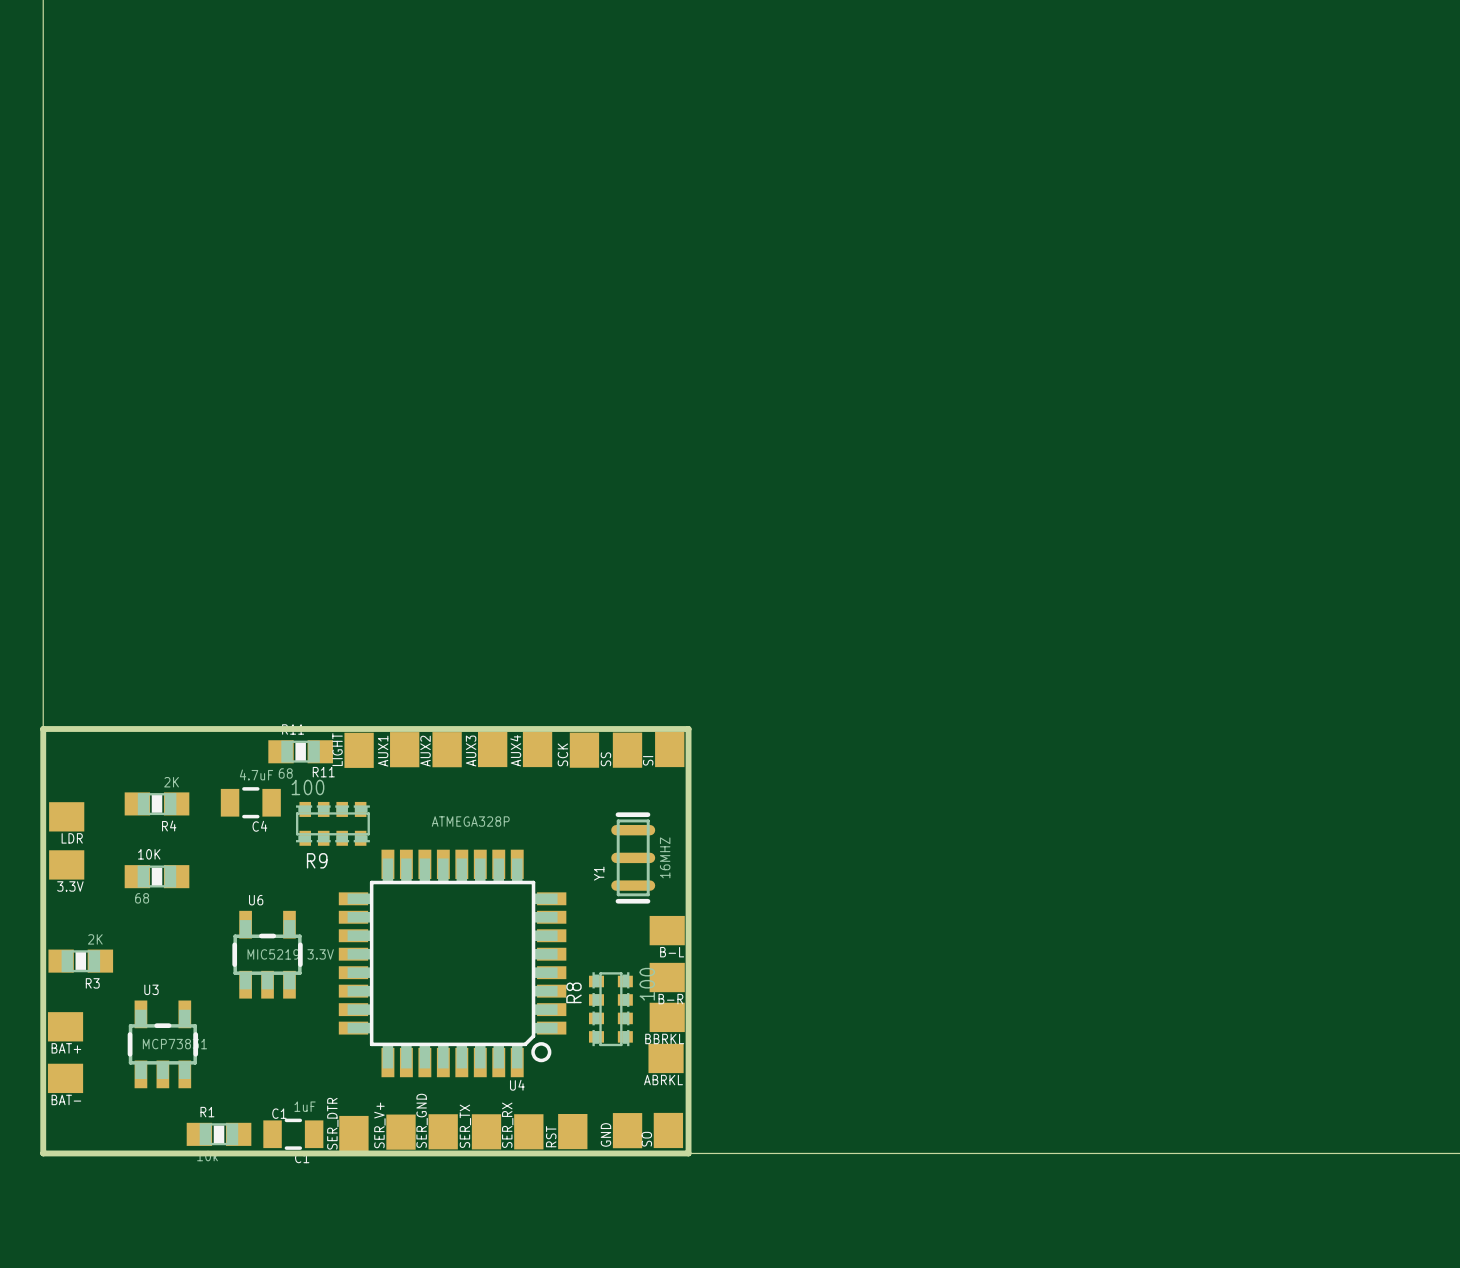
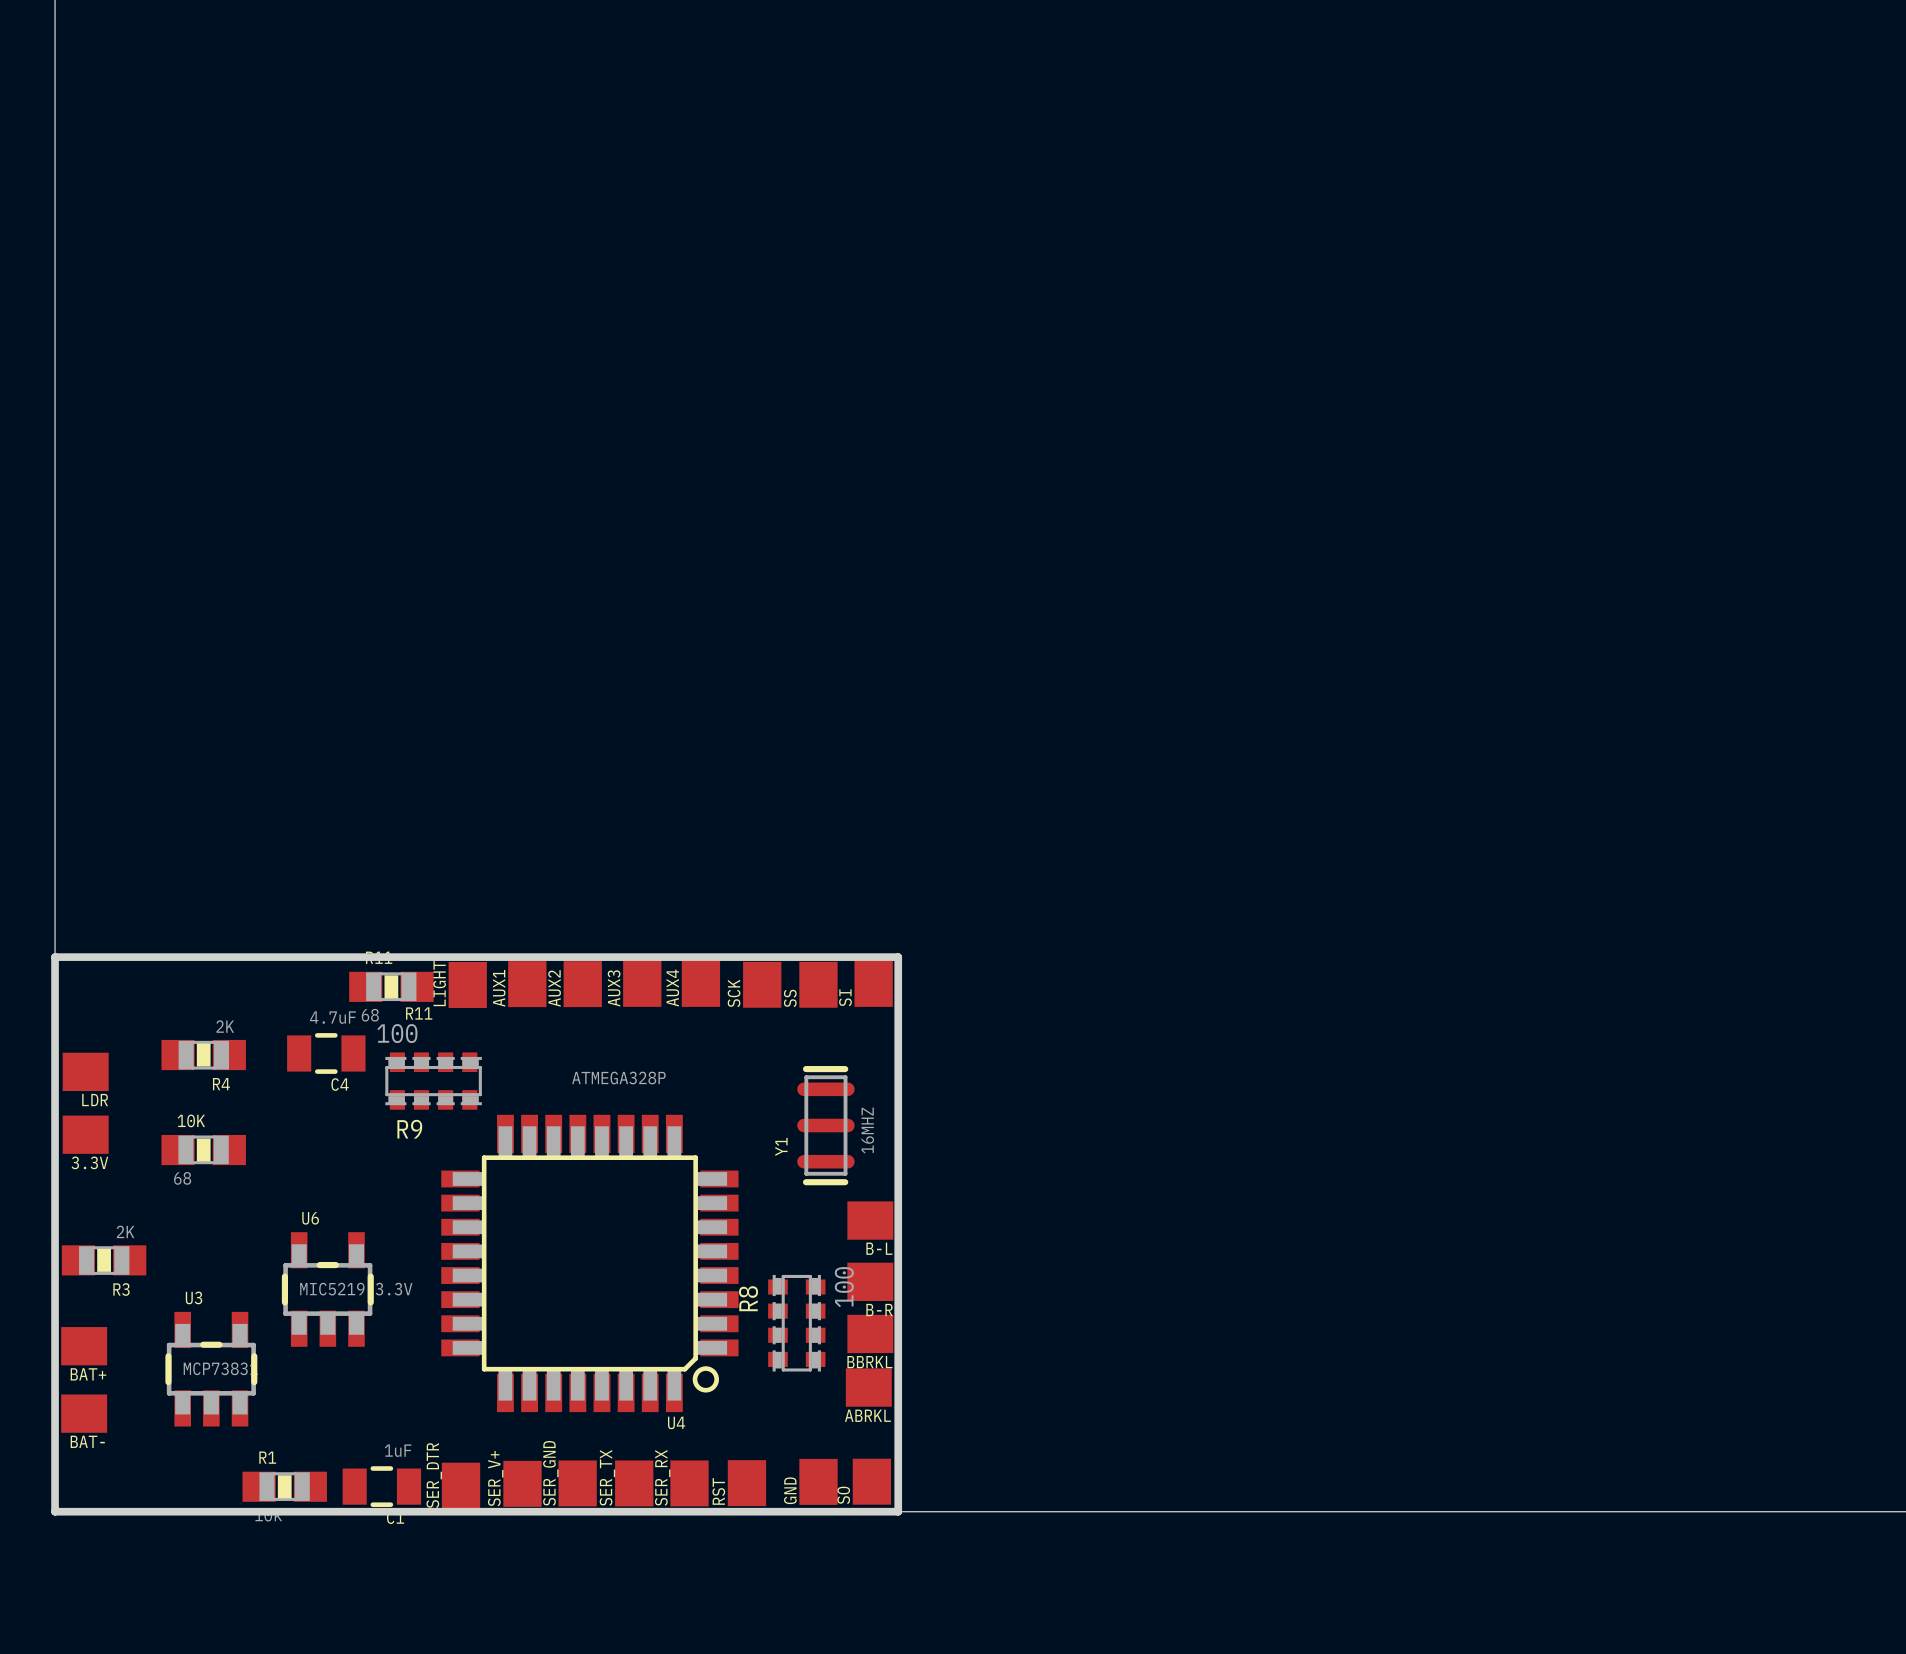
U6 position: (267, 954) -> (327, 1289)
text: C1 (279, 1113) -> none

